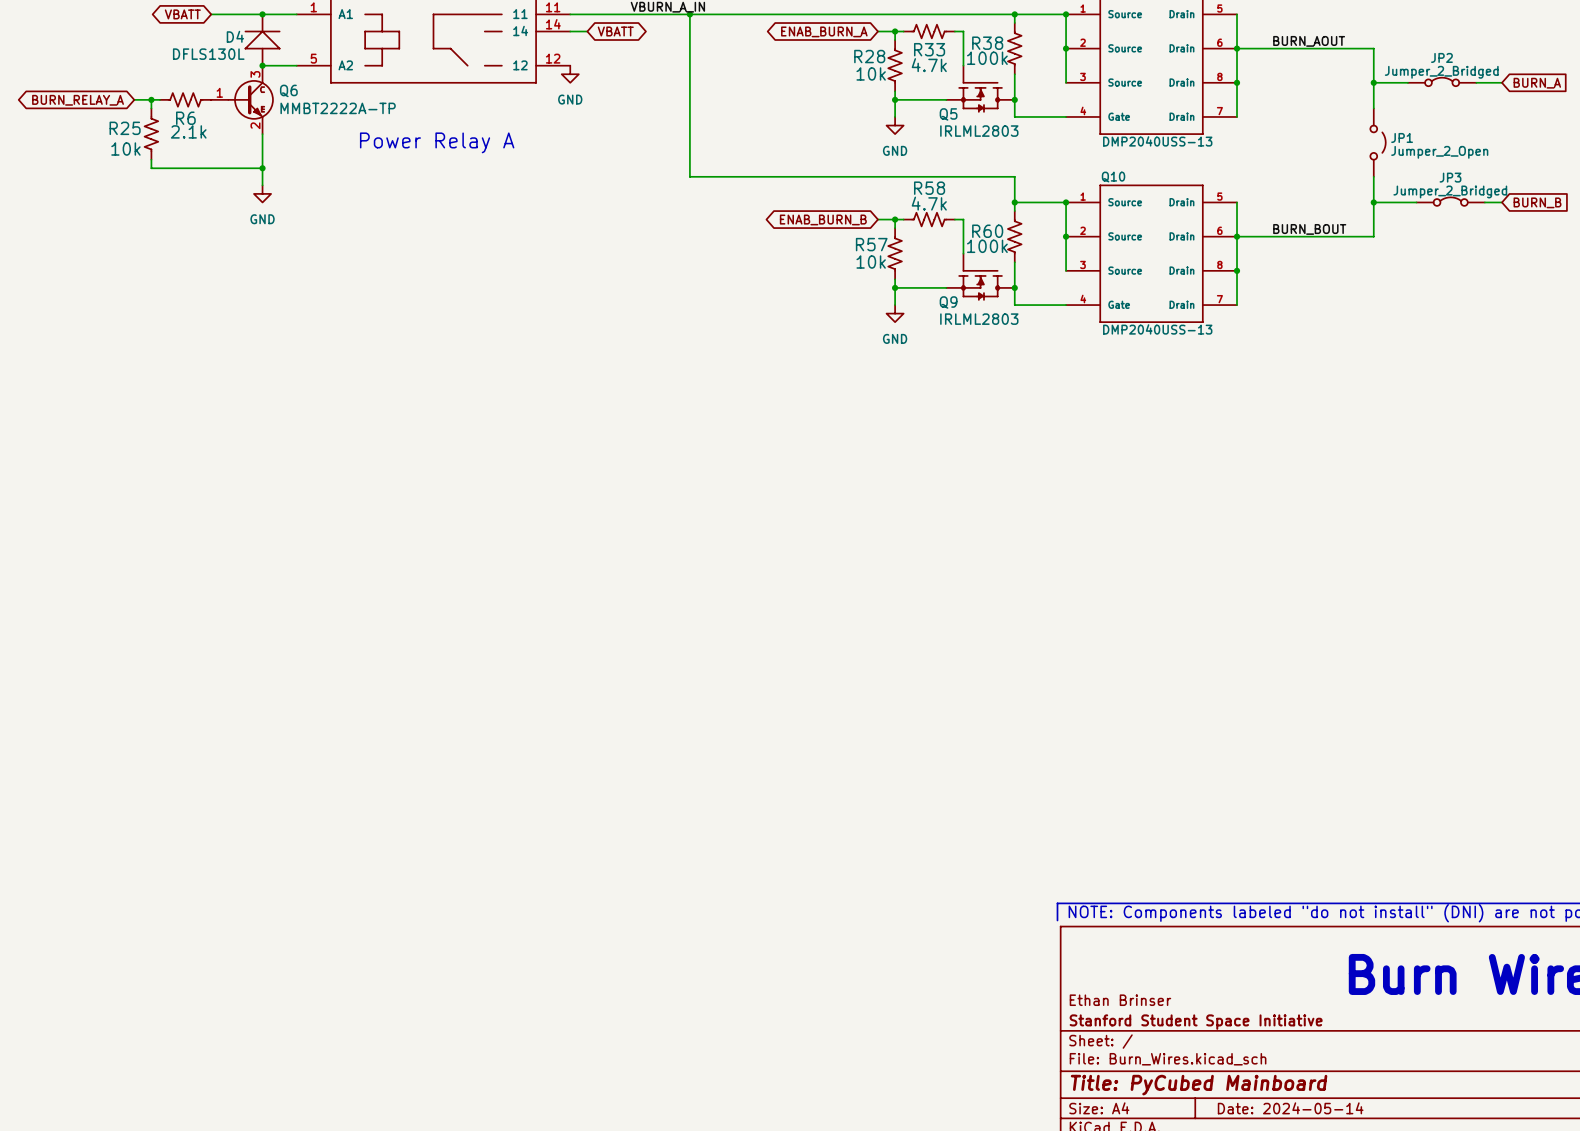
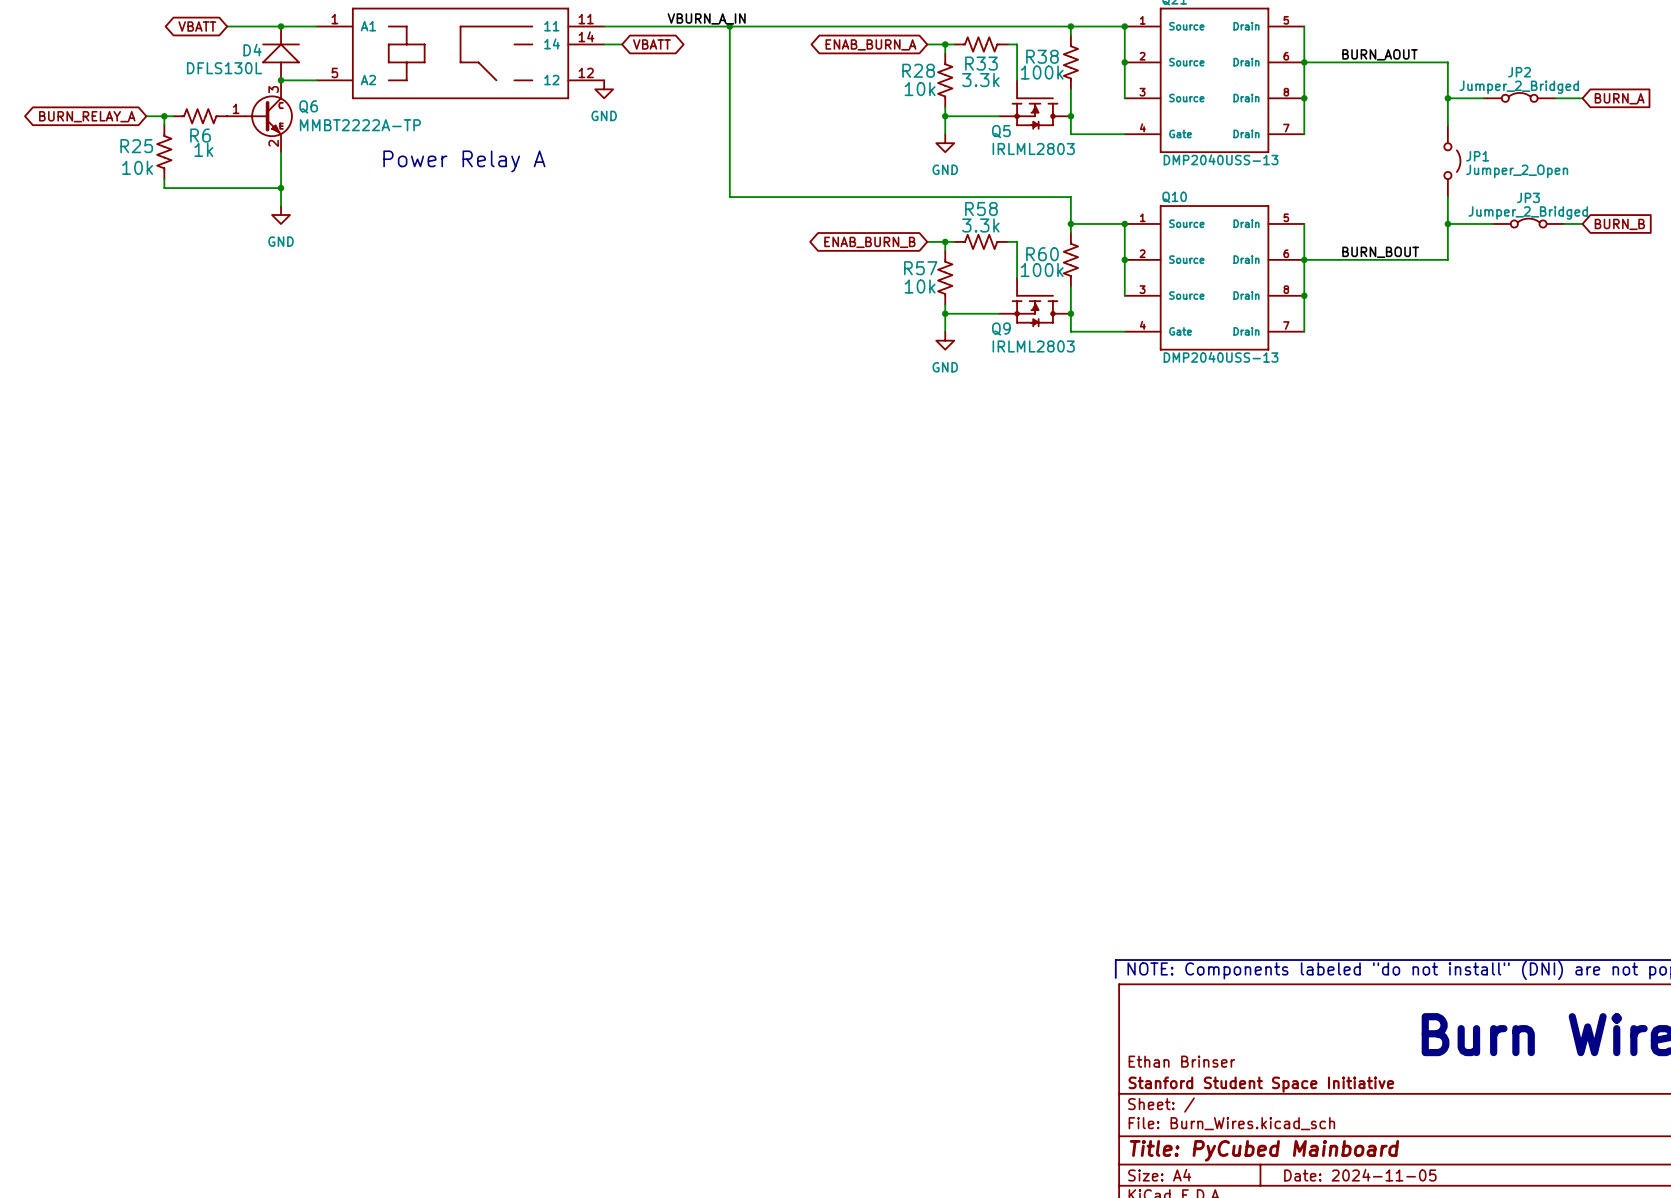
R33 value: 4.7k (929, 65) -> 3.3k (980, 80)
R6 value: 2.1k (188, 131) -> 1k (203, 149)
R58 value: 4.7k (929, 203) -> 3.3k (980, 225)
title block: Date: 2024-05-14 (1290, 1108) -> Date: 2024-11-05 (1360, 1175)

